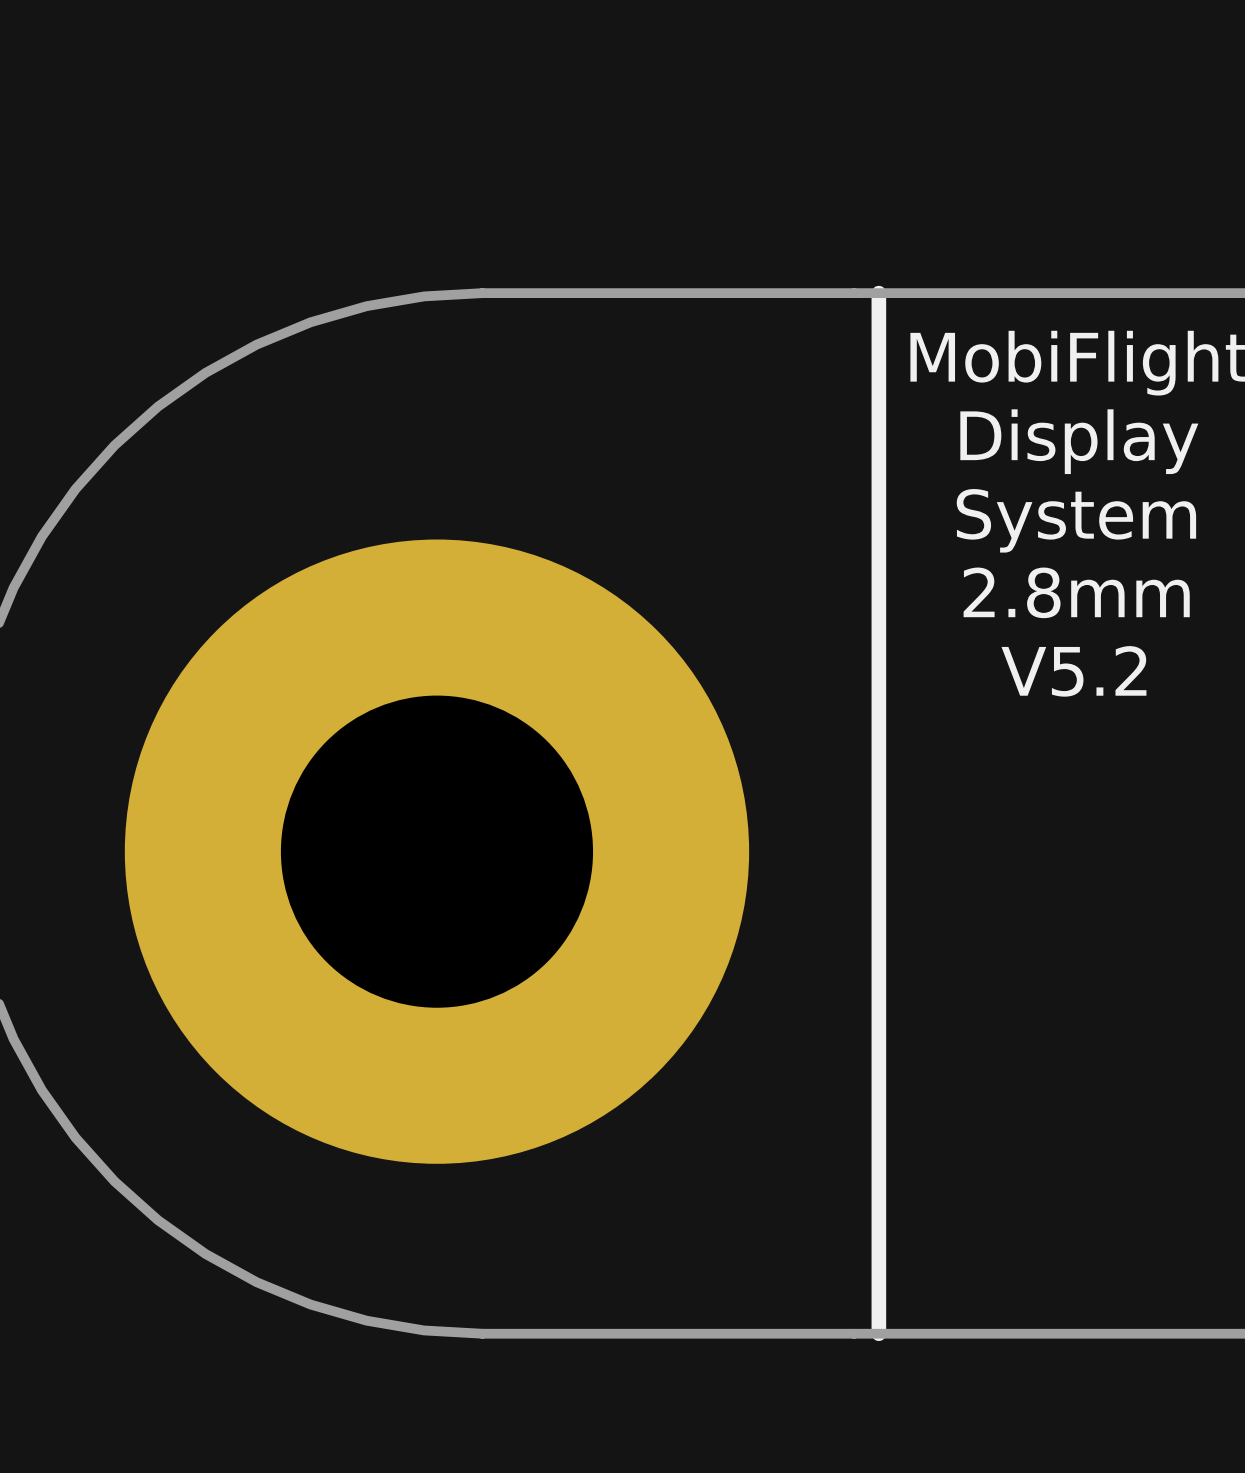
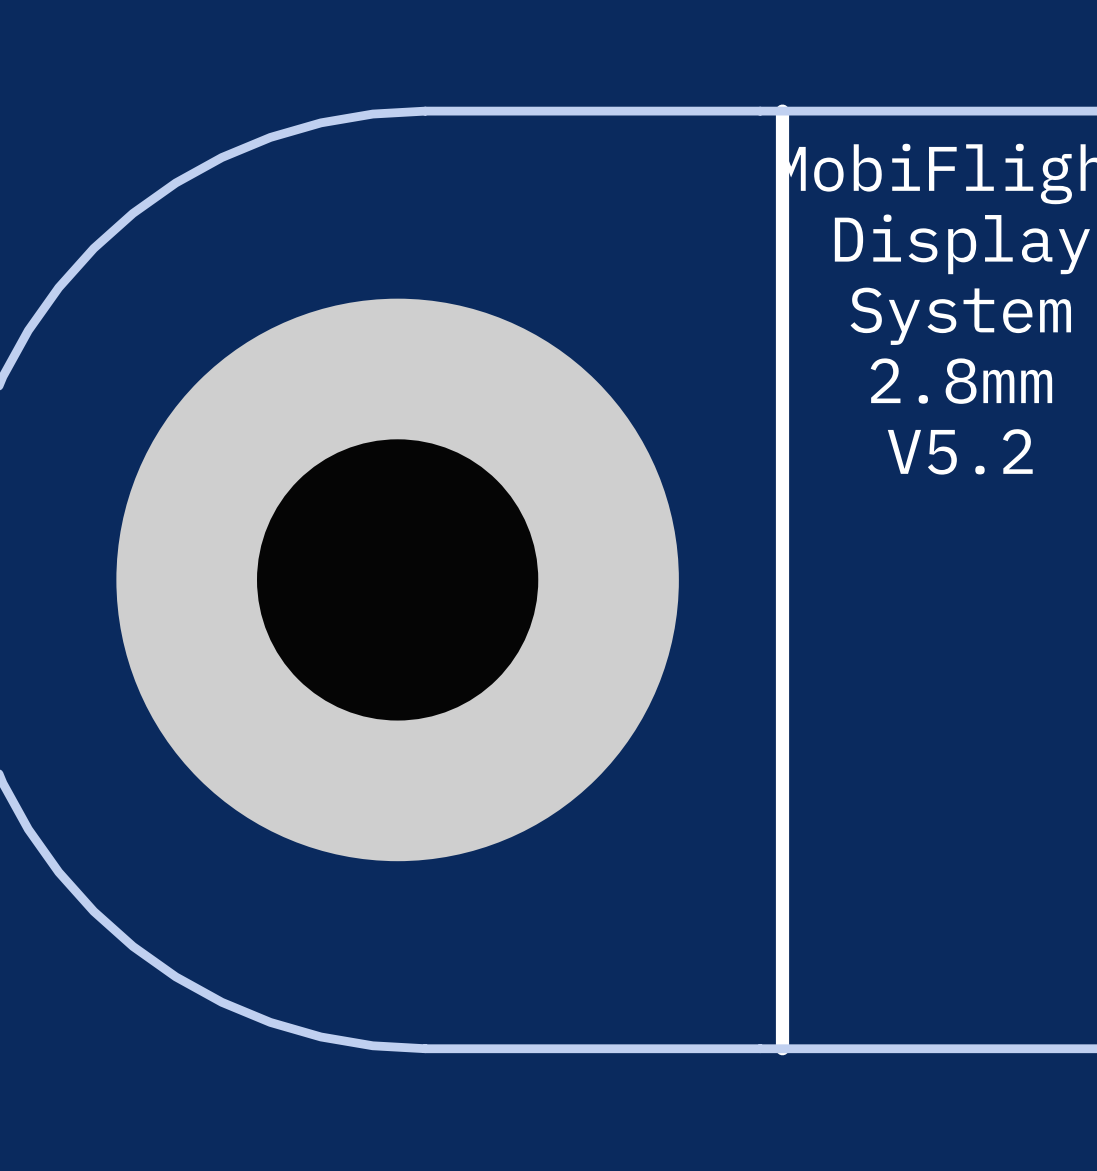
part position: (436, 851) -> (397, 579)

